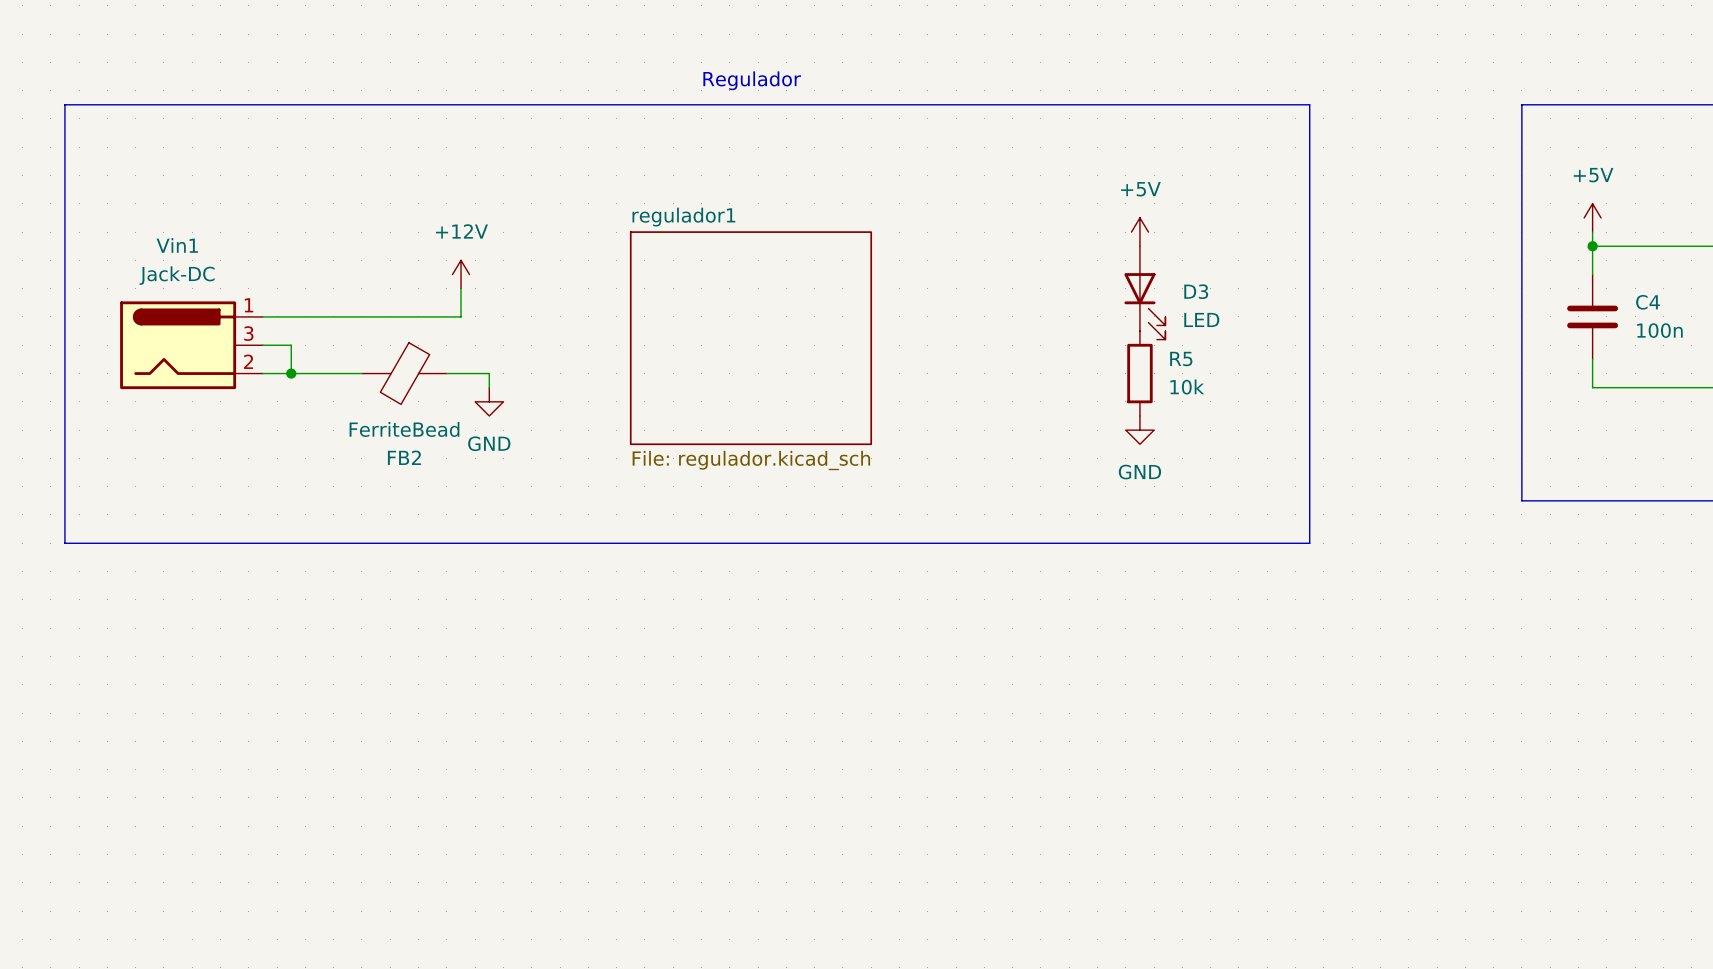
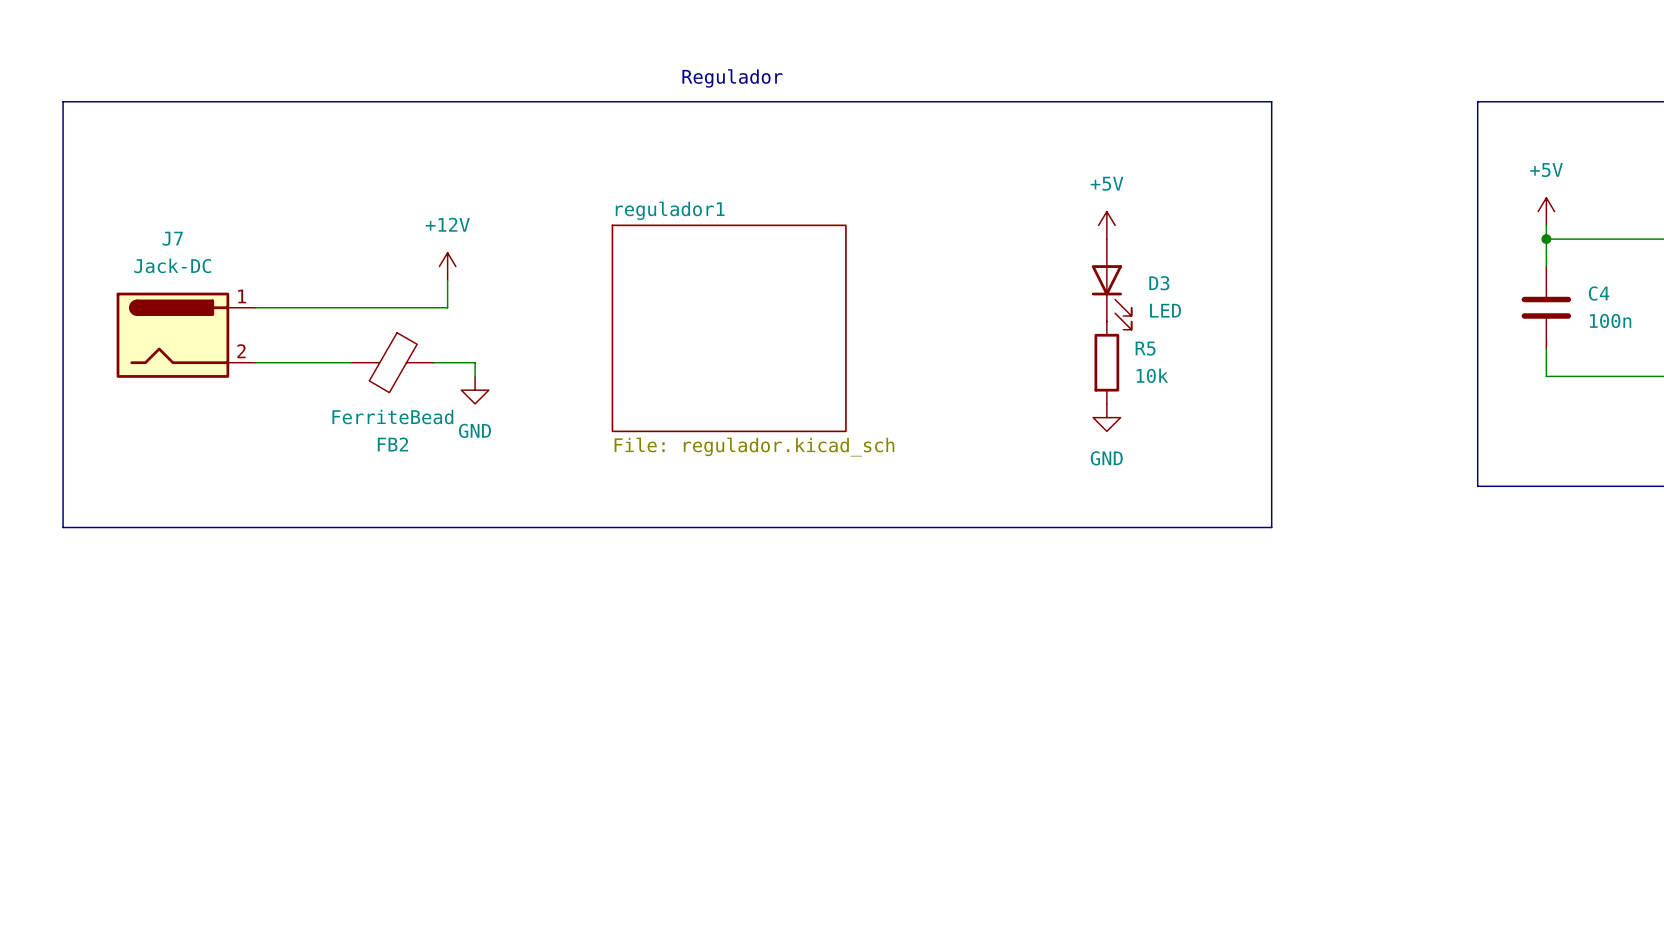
Vin1: Jack-DC (191, 345) -> none
J7: none -> Jack-DC (185, 335)
wire: (262, 345) (291, 345) (291, 373) -> none
junction: (291, 373) -> none

